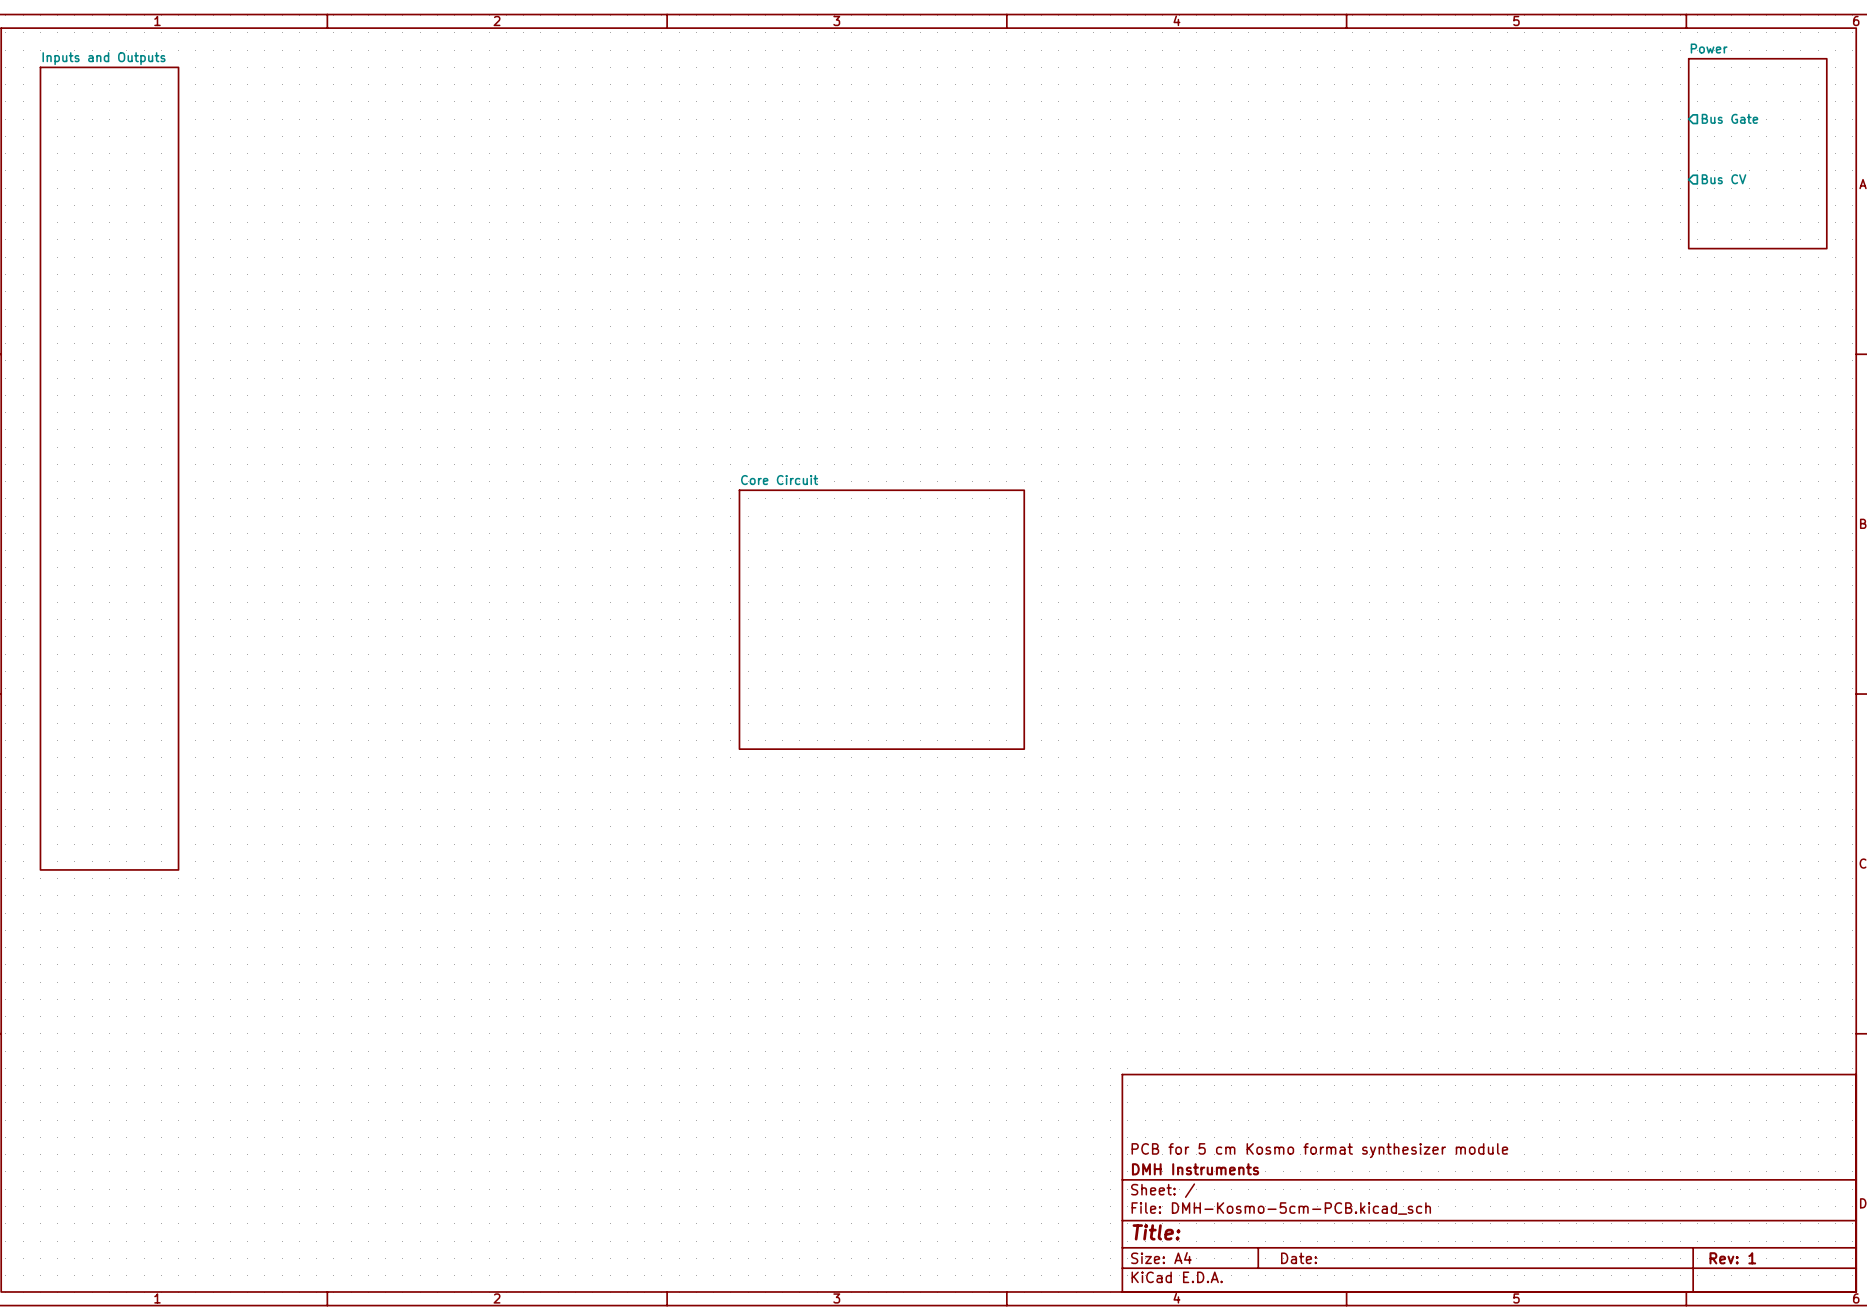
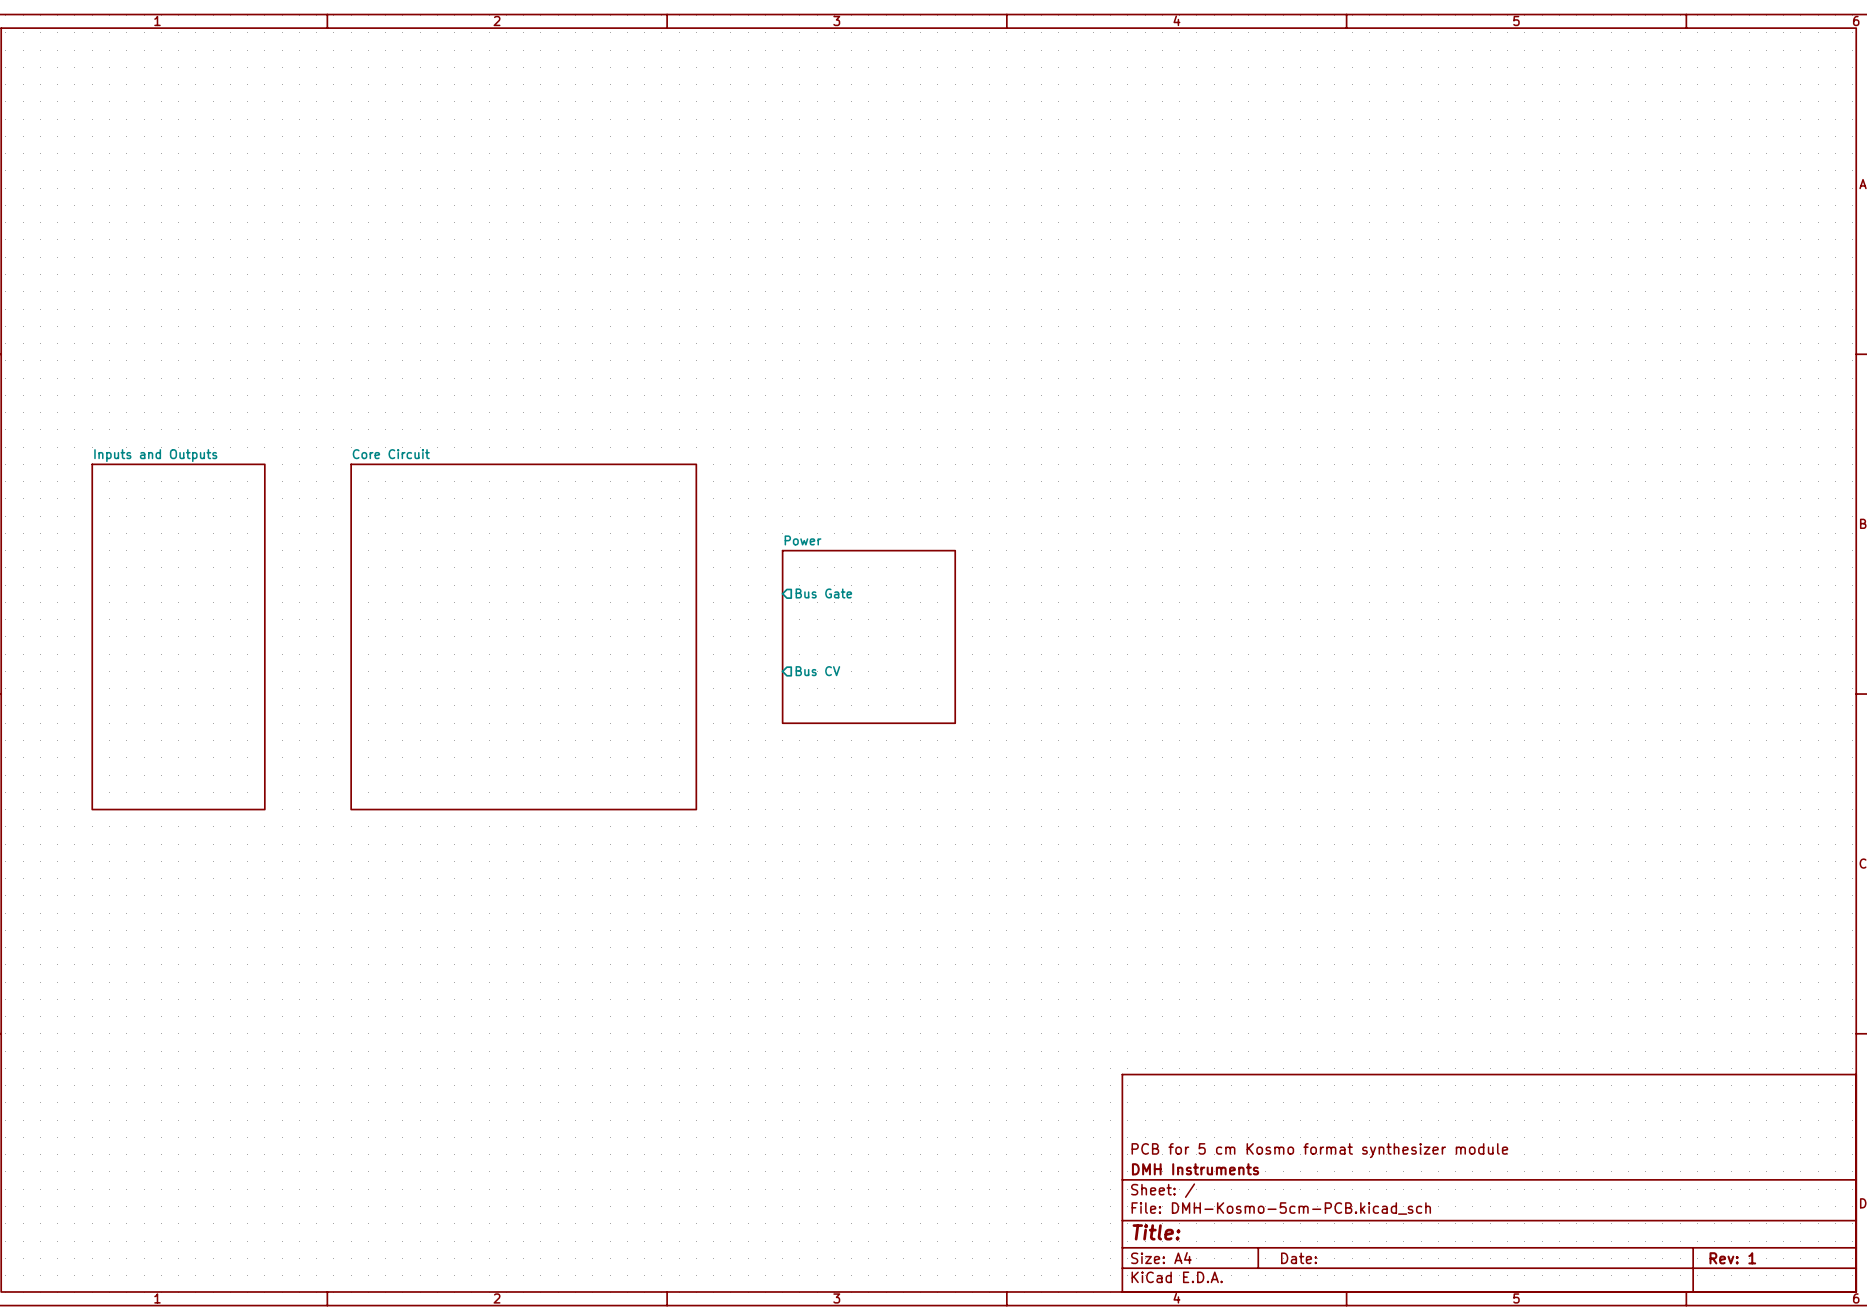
sheet pin: Bus Gate (1729, 118) -> none
sheet Power: (1757, 153) -> none
sheet pin: Bus CV (1724, 179) -> none
sheet Inputs and Outputs: (109, 468) -> none
sheet pin: none -> Bus Gate (823, 593)
sheet Core Circuit: (881, 619) -> none
sheet Inputs and Outputs: none -> (178, 636)
sheet Core Circuit: none -> (523, 636)
sheet Power: none -> (868, 636)
sheet pin: none -> Bus CV (817, 671)

